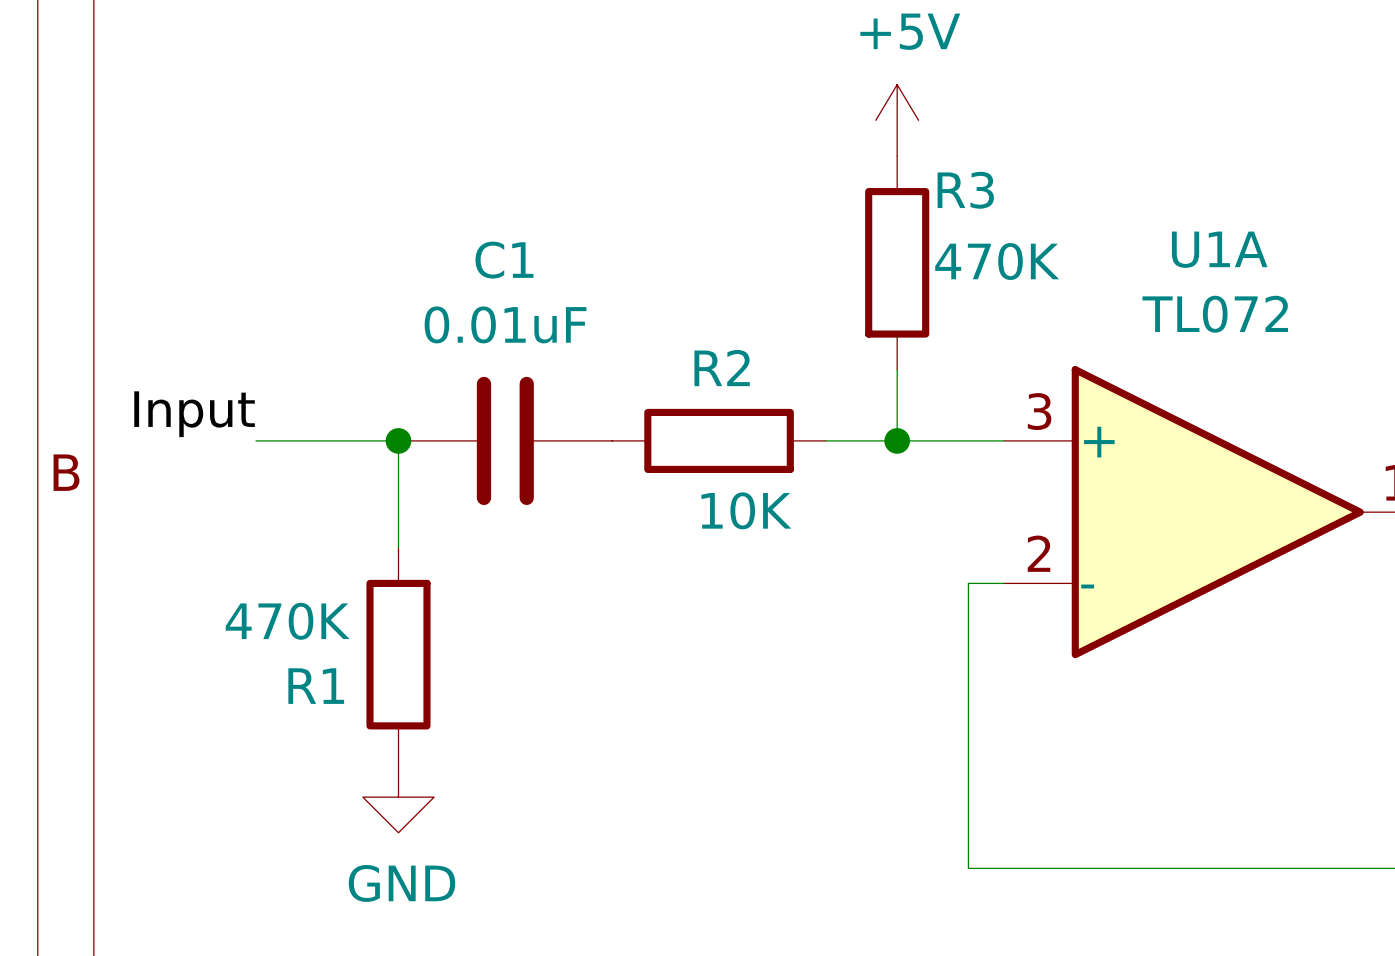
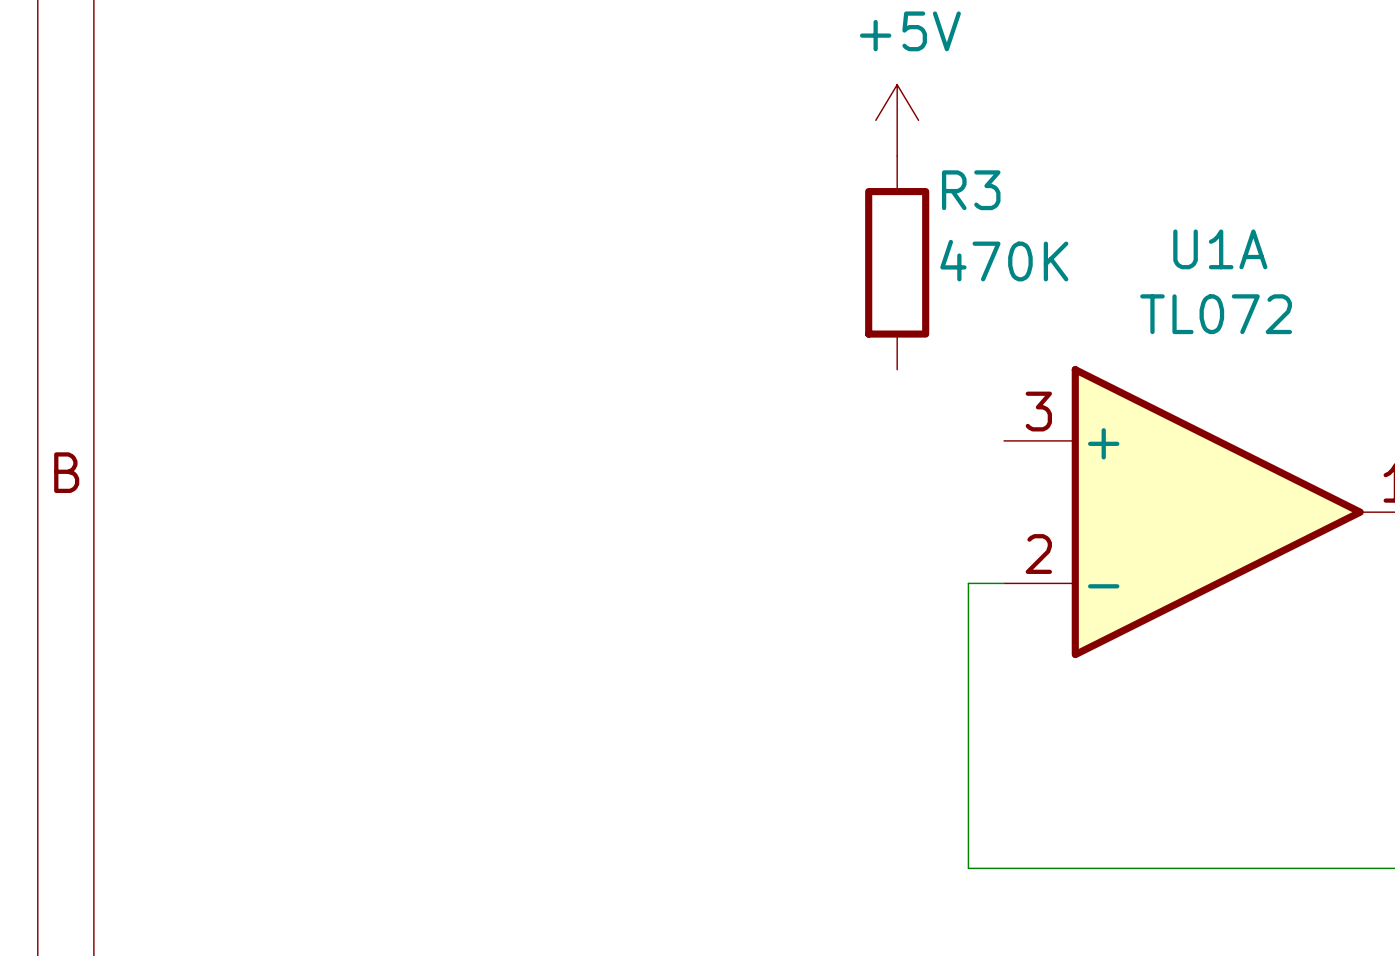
wire: (897, 369) (897, 440) -> none
label: Input (194, 414) -> none
wire: (256, 440) (398, 440) (398, 547) -> none
junction: (398, 440) -> none
C1: 0.01uF (505, 440) -> none
R2: 10K (719, 440) -> none
wire: (825, 440) (1004, 440) -> none
junction: (897, 440) -> none
R1: 470K (398, 654) -> none
power symbol: GND (398, 797) -> none

